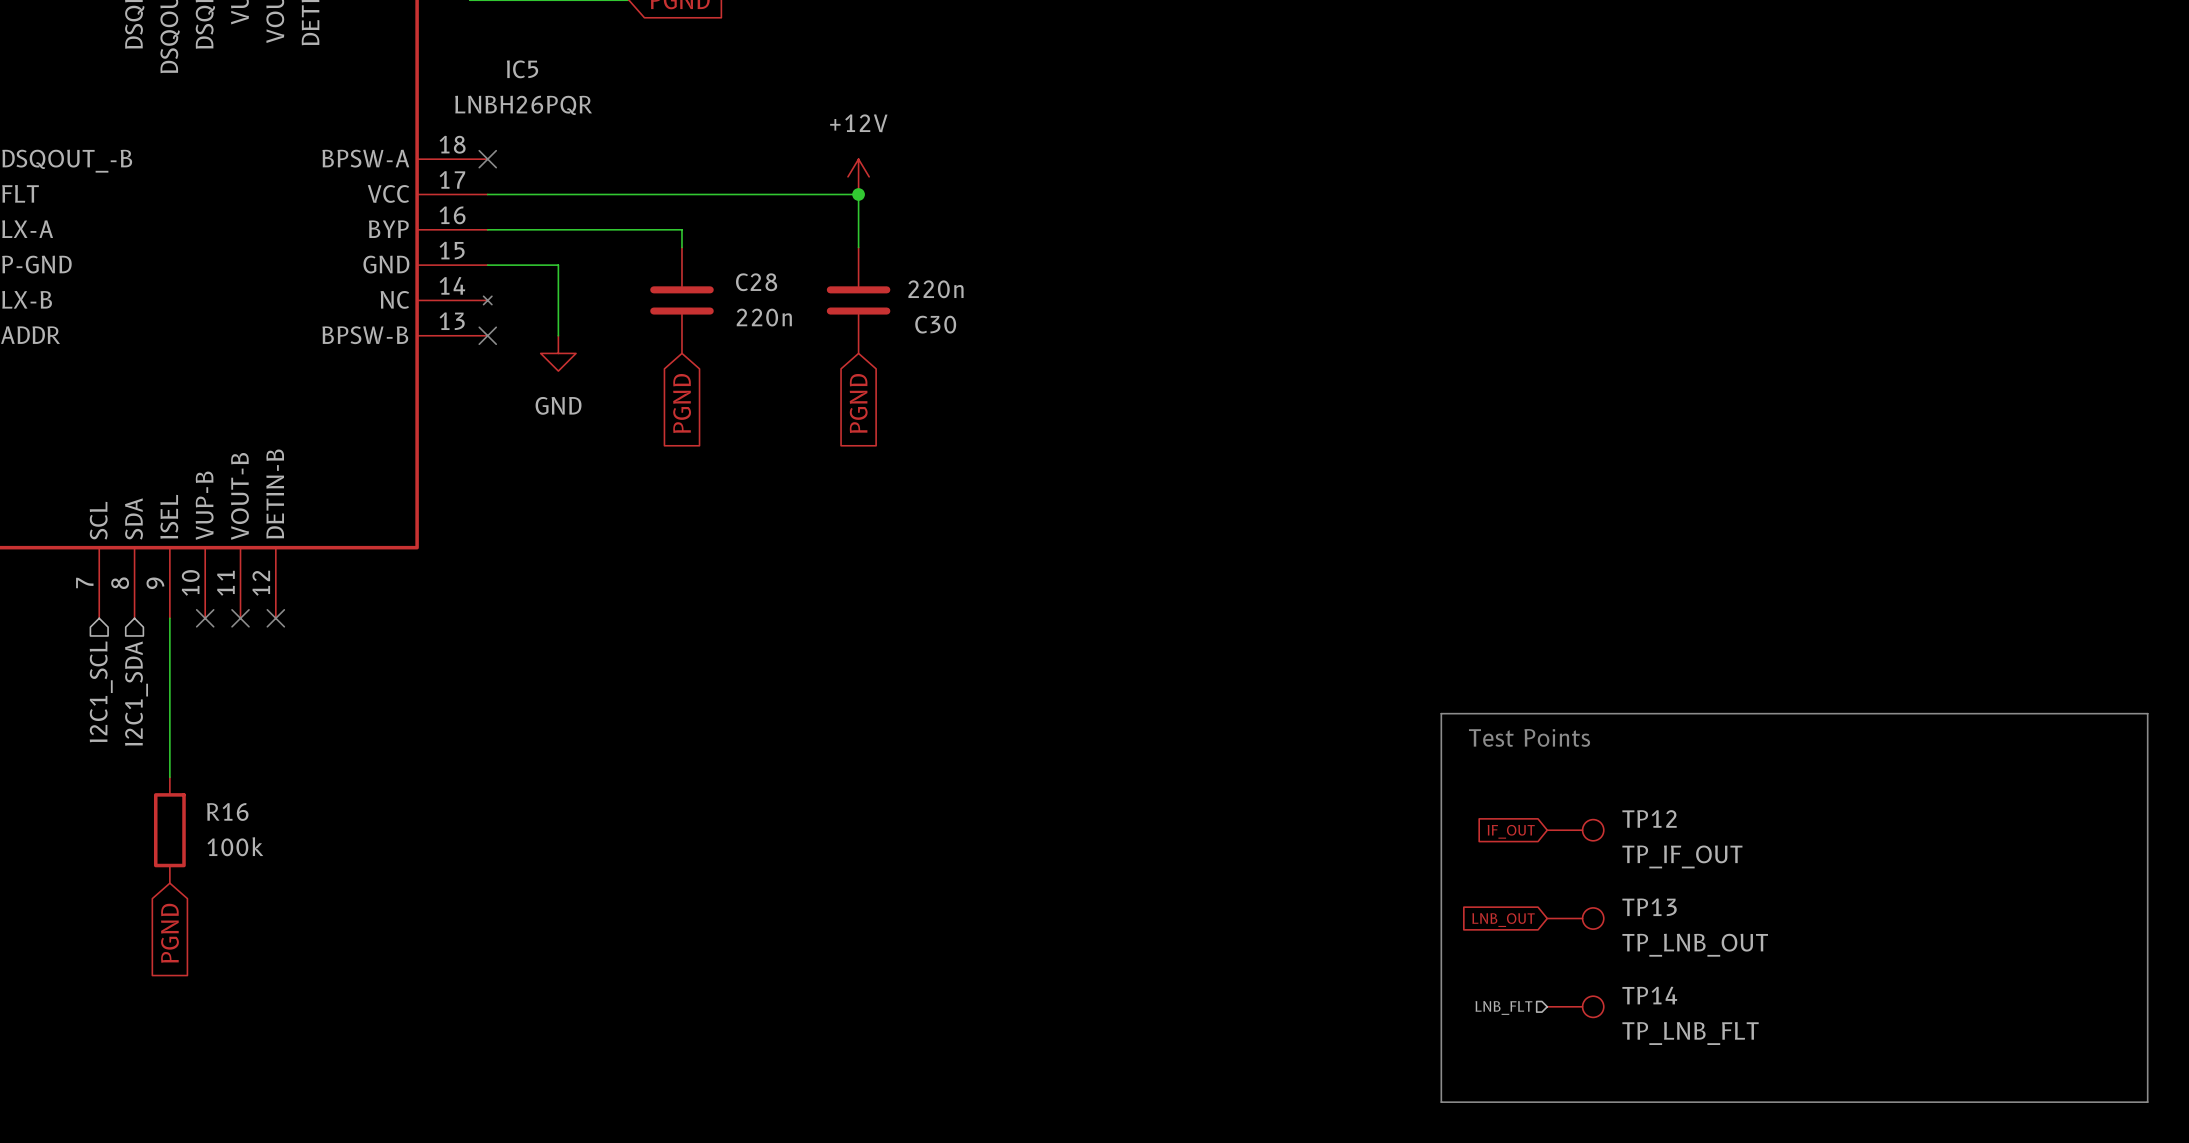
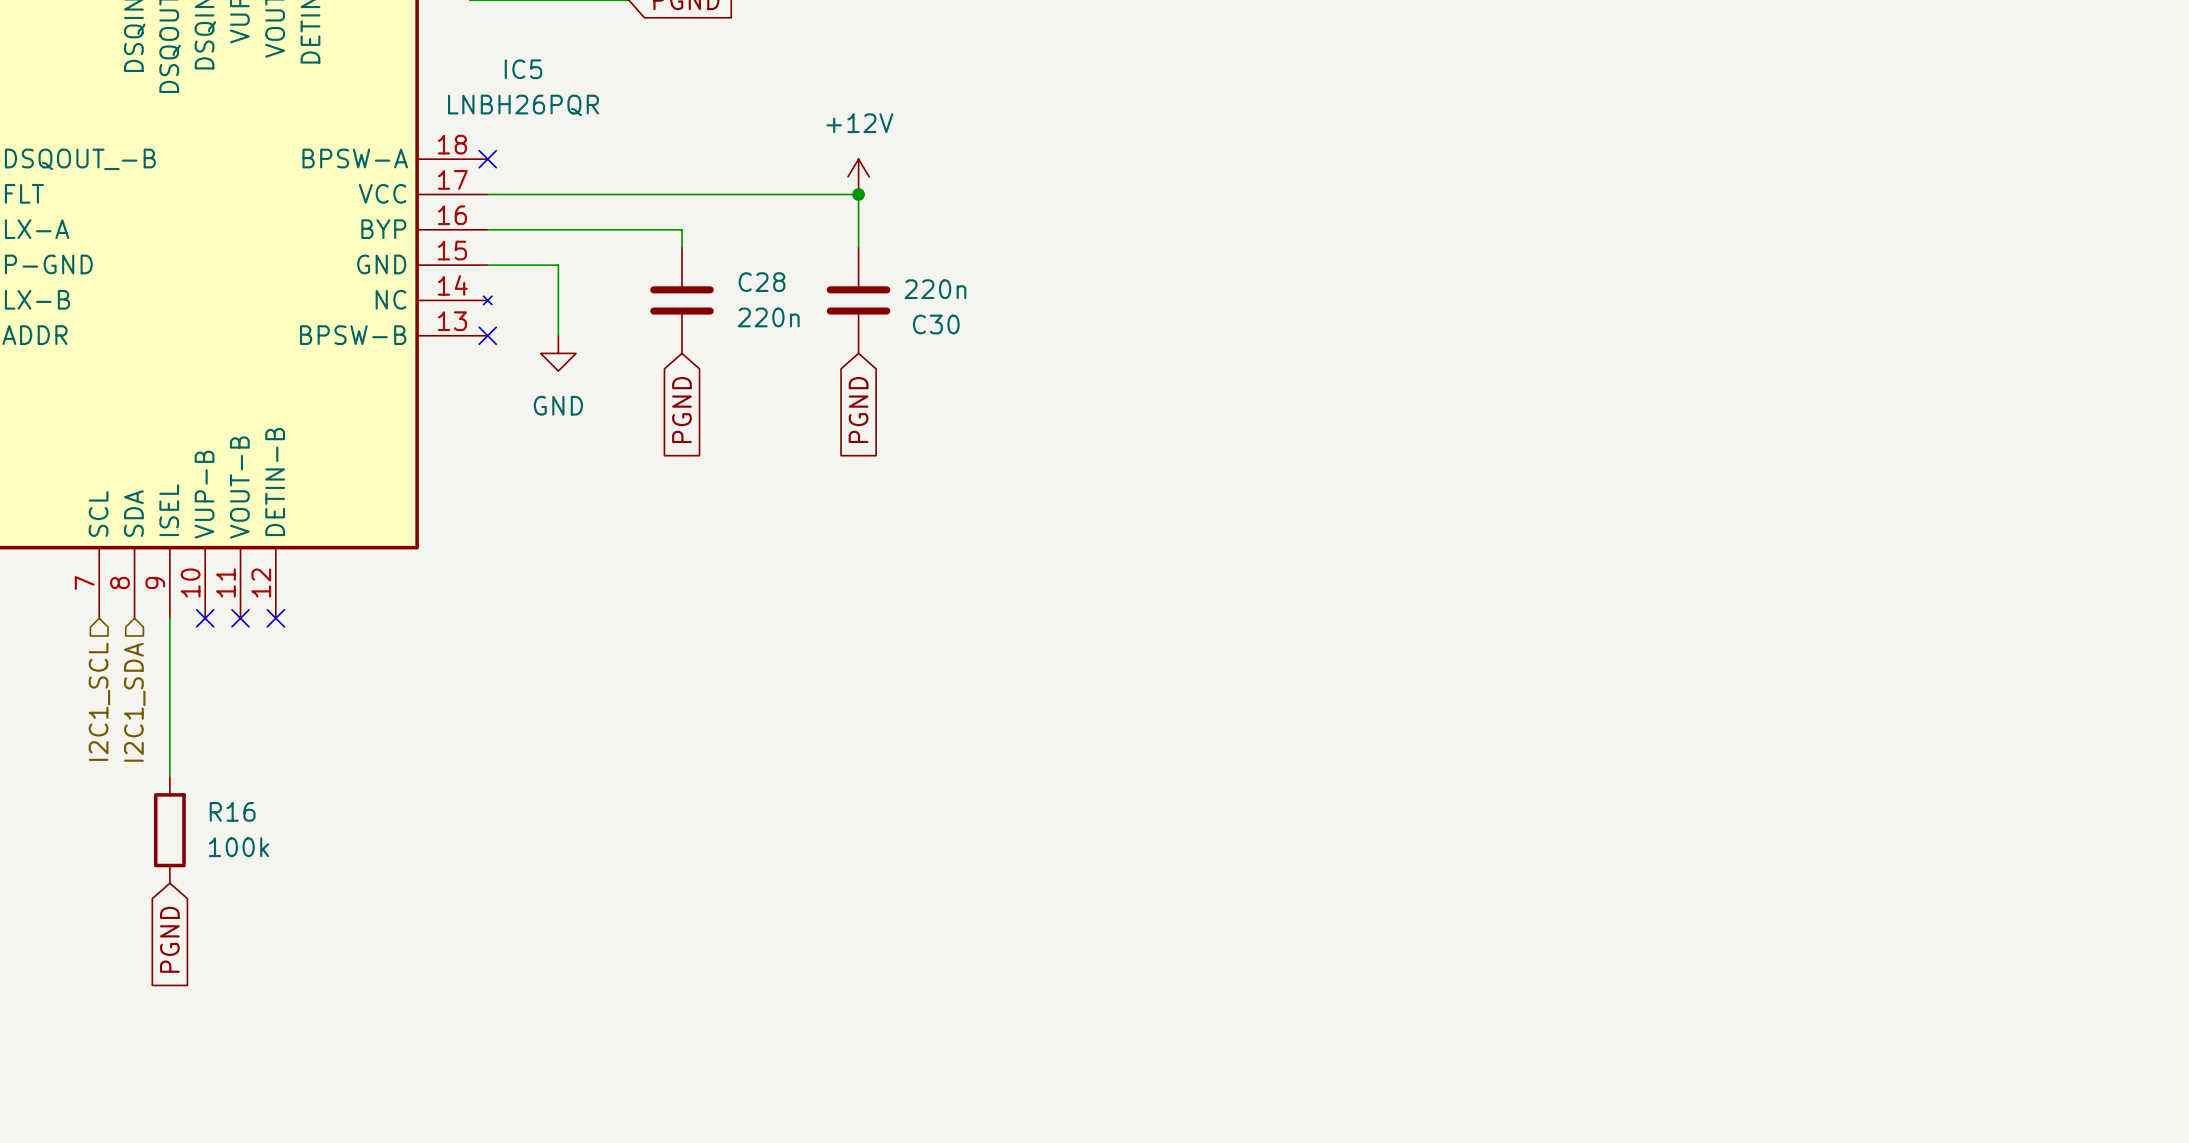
line: (1441, 713) (2147, 713) (2147, 1102) (1441, 1102) (1441, 713) -> none
text: Test Points (1529, 737) -> none
TP12: TP_IF_OUT (1575, 830) -> none
global label: IF_OUT (1511, 831) -> none
TP13: TP_LNB_OUT (1575, 918) -> none
global label: LNB_OUT (1503, 920) -> none
TP14: TP_LNB_FLT (1575, 1006) -> none
hierarchical label: LNB_FLT (1503, 1007) -> none

